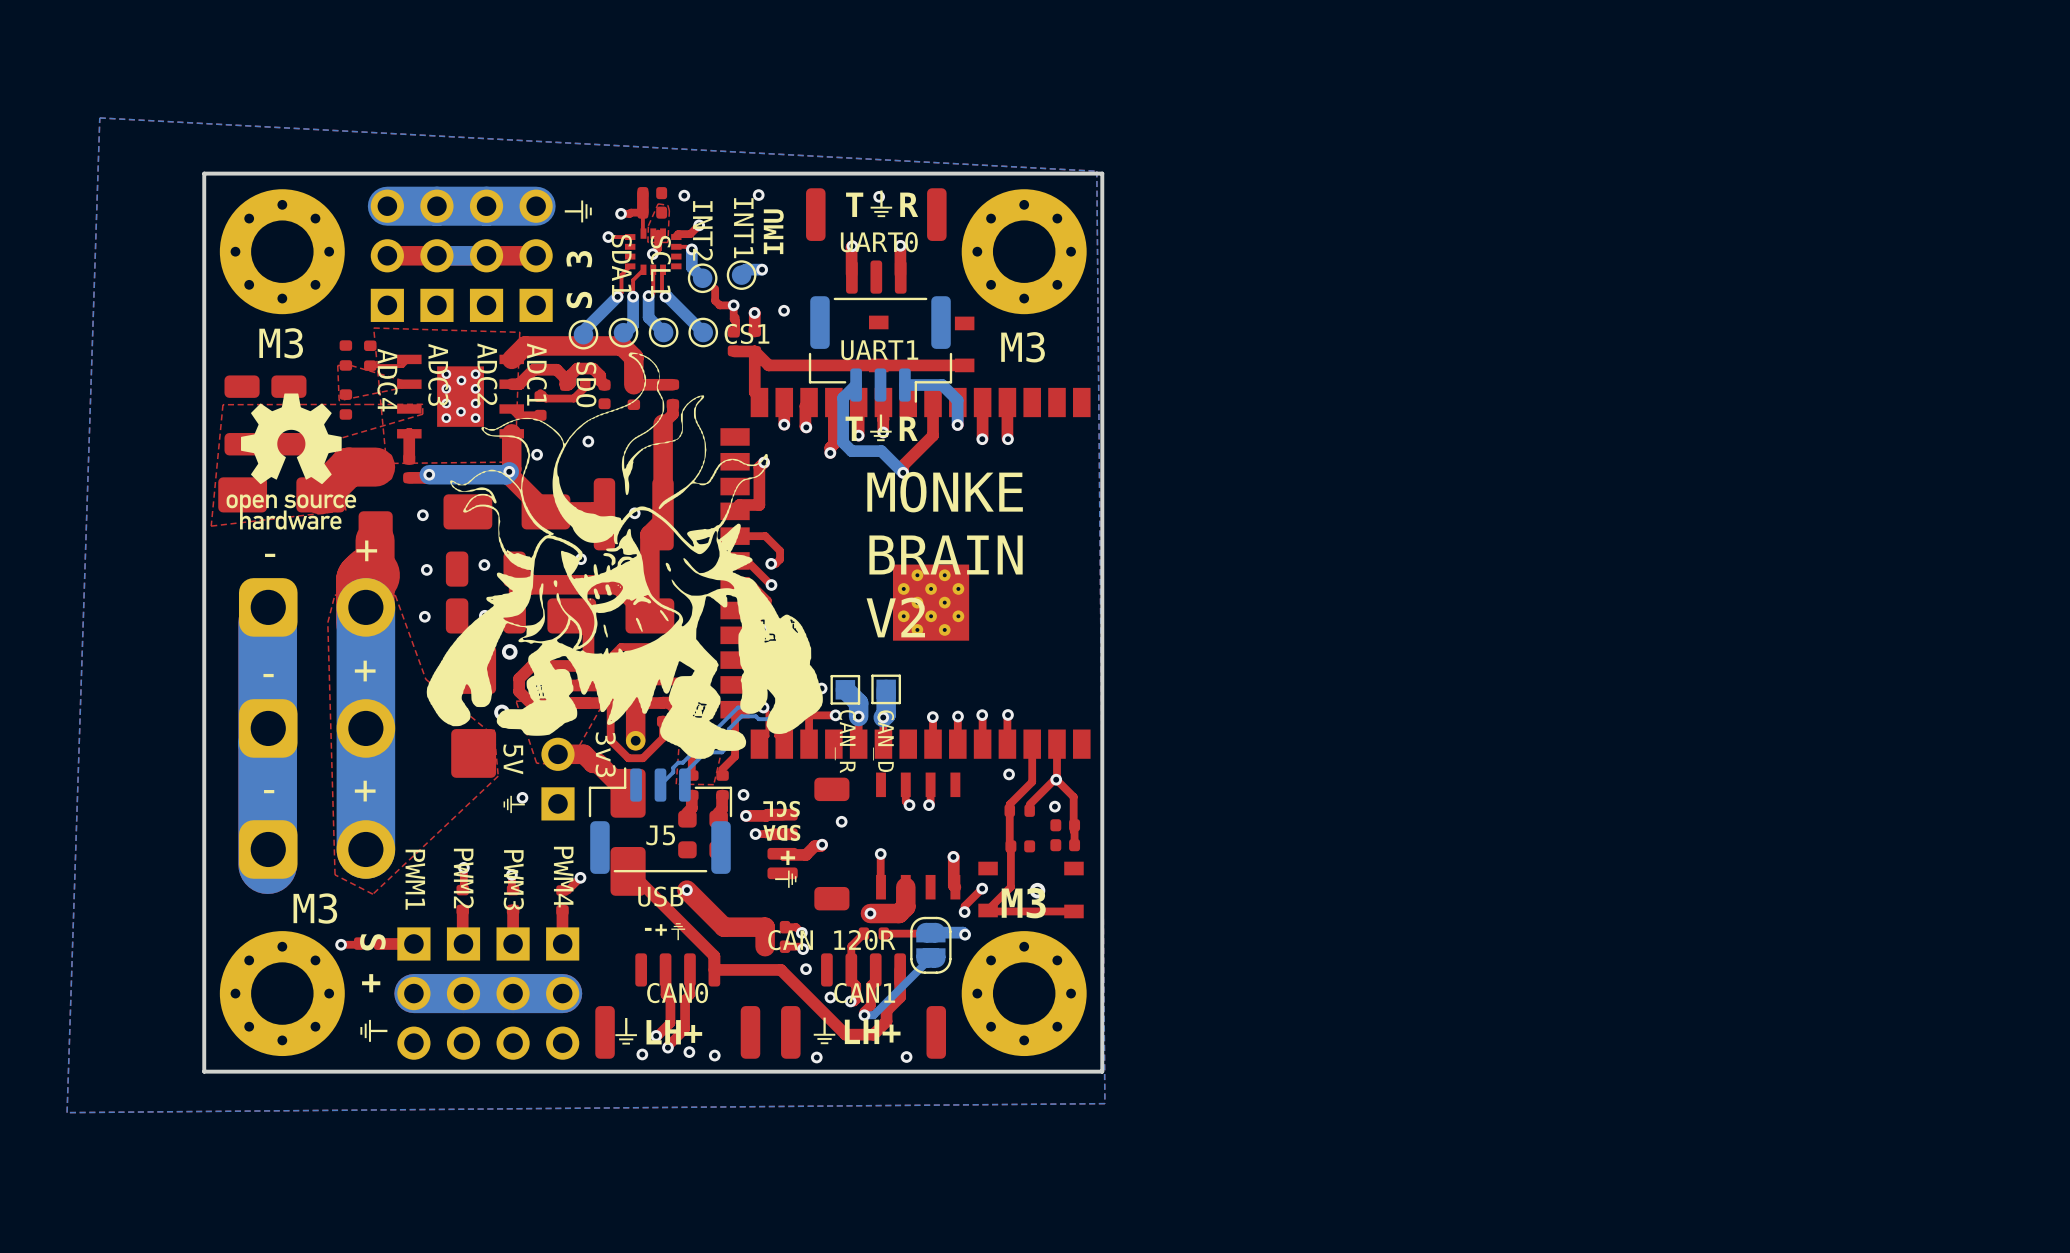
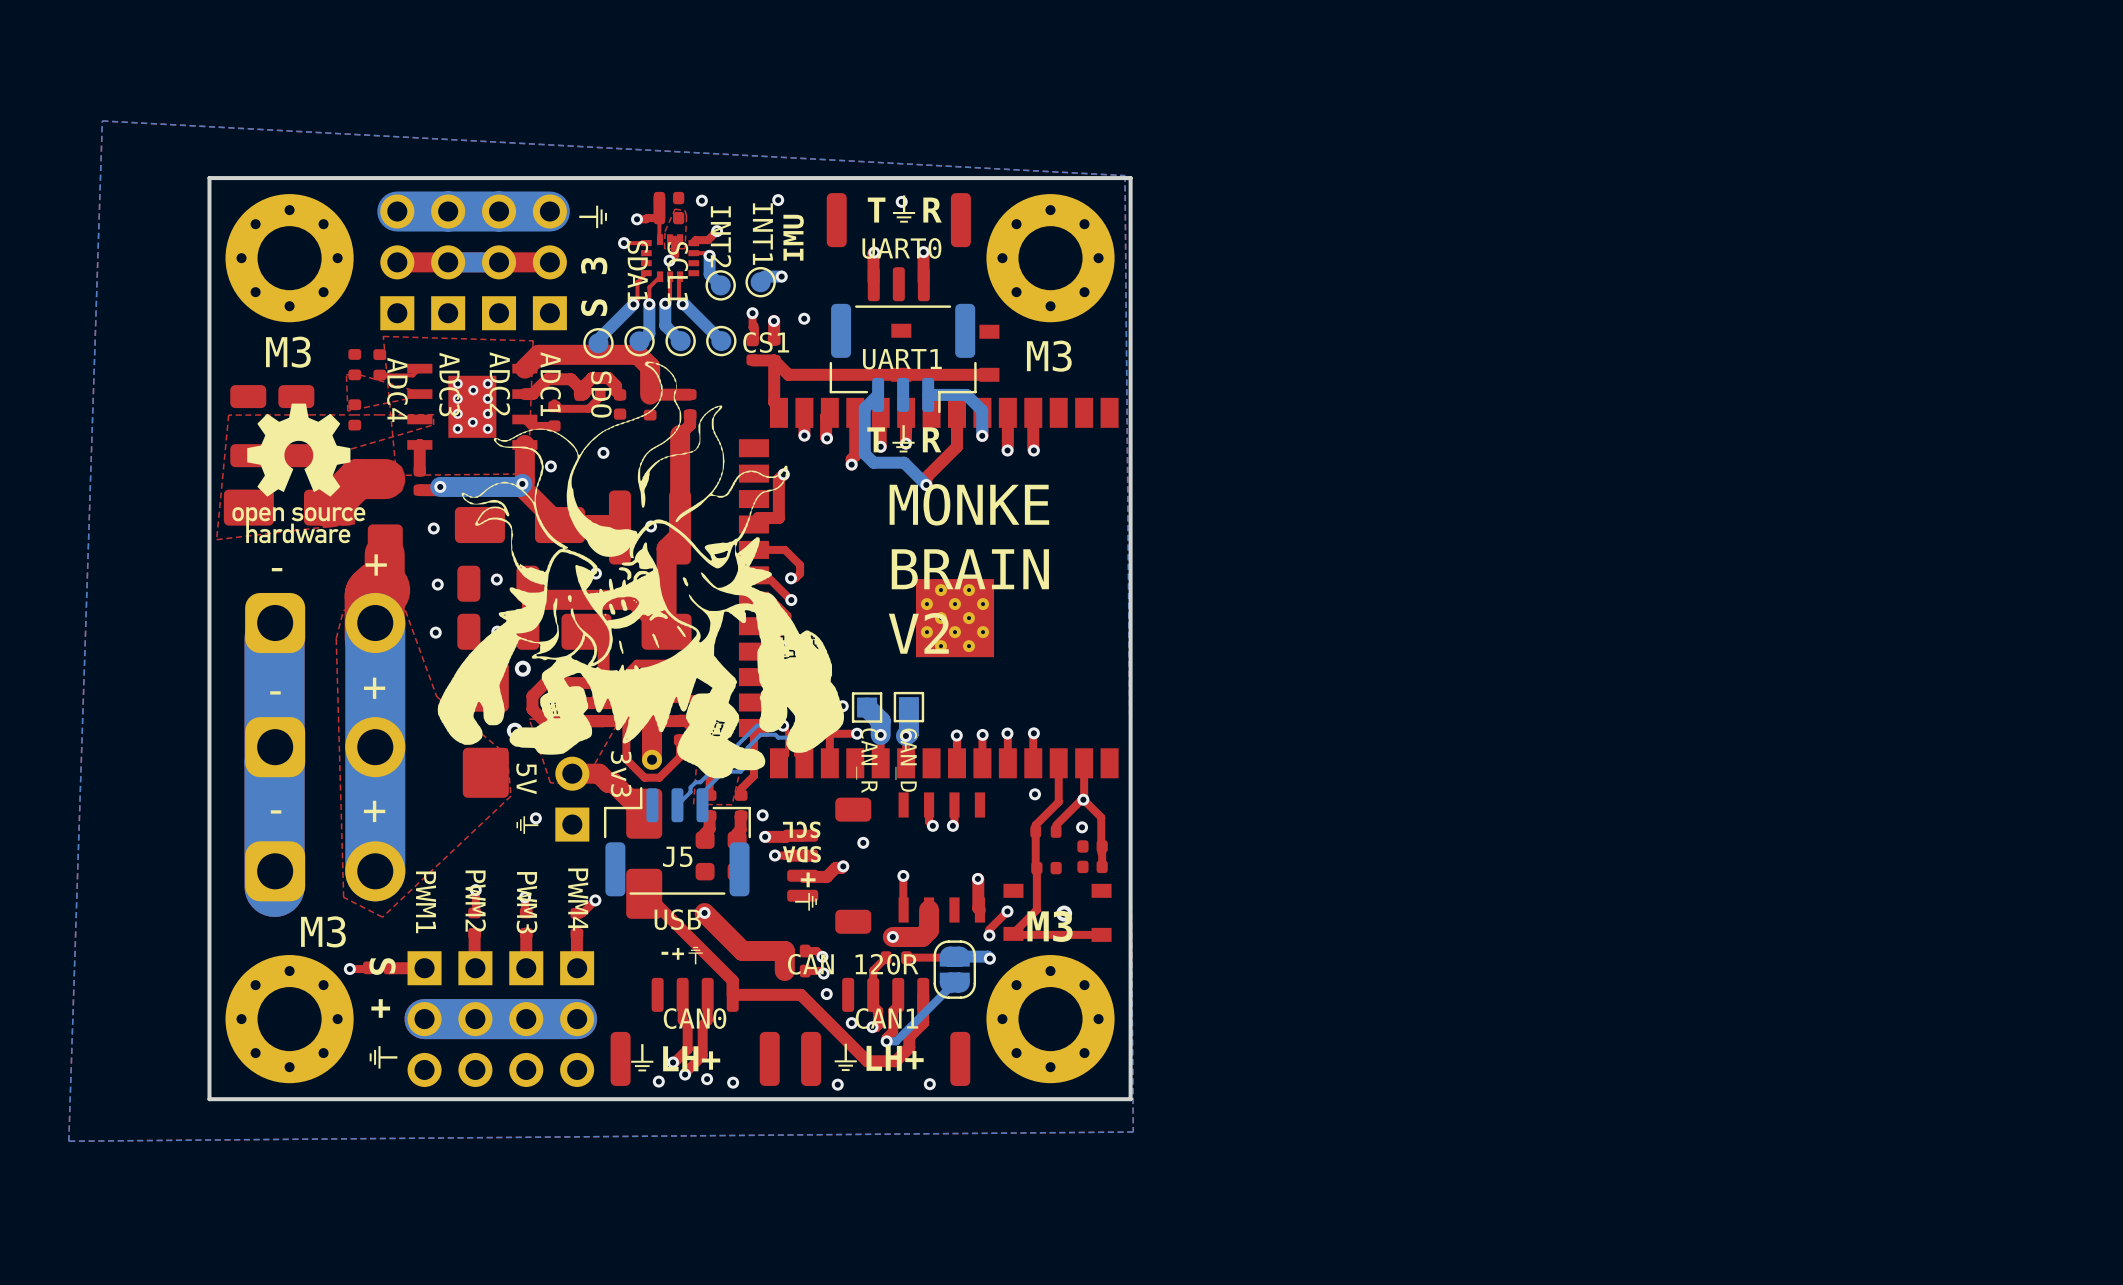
top track: (715, 288) (715, 300) (719, 305) (733, 305) -> none

